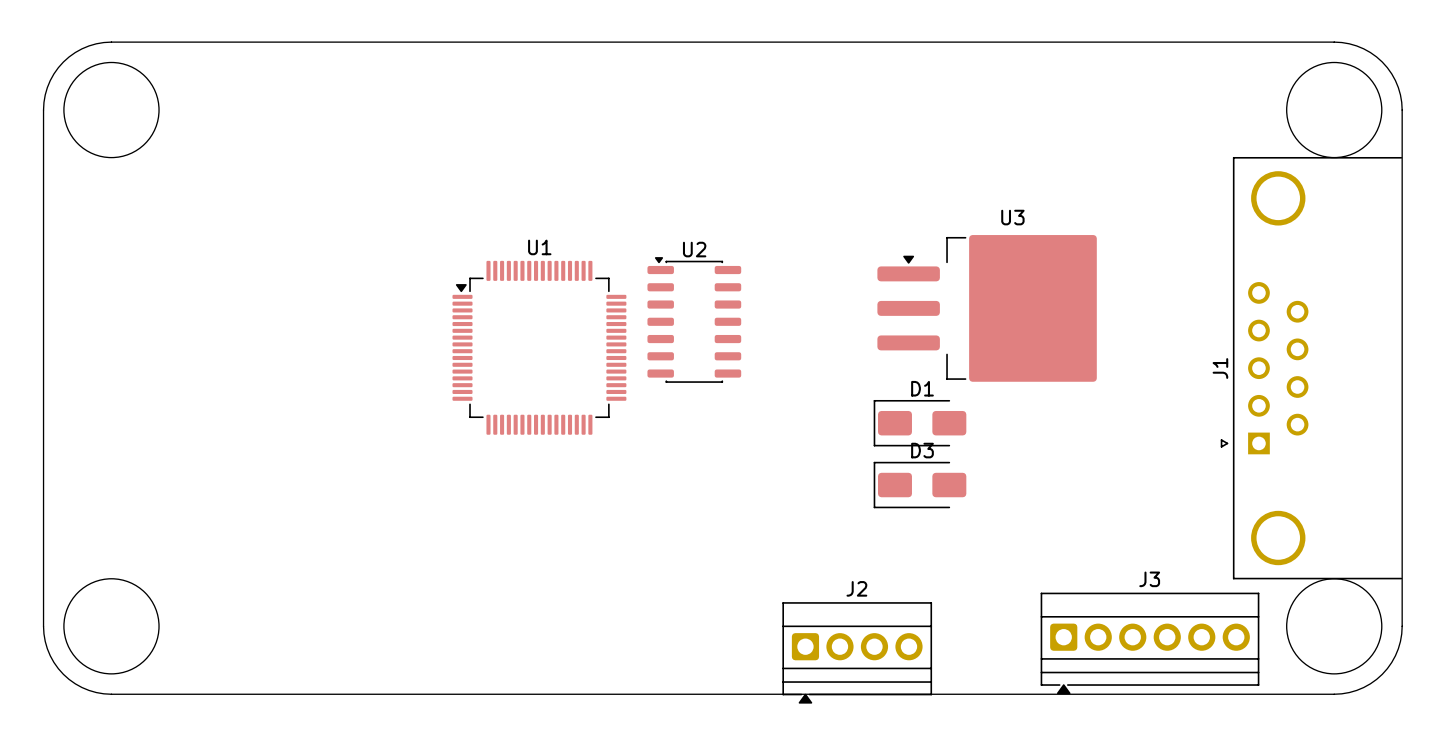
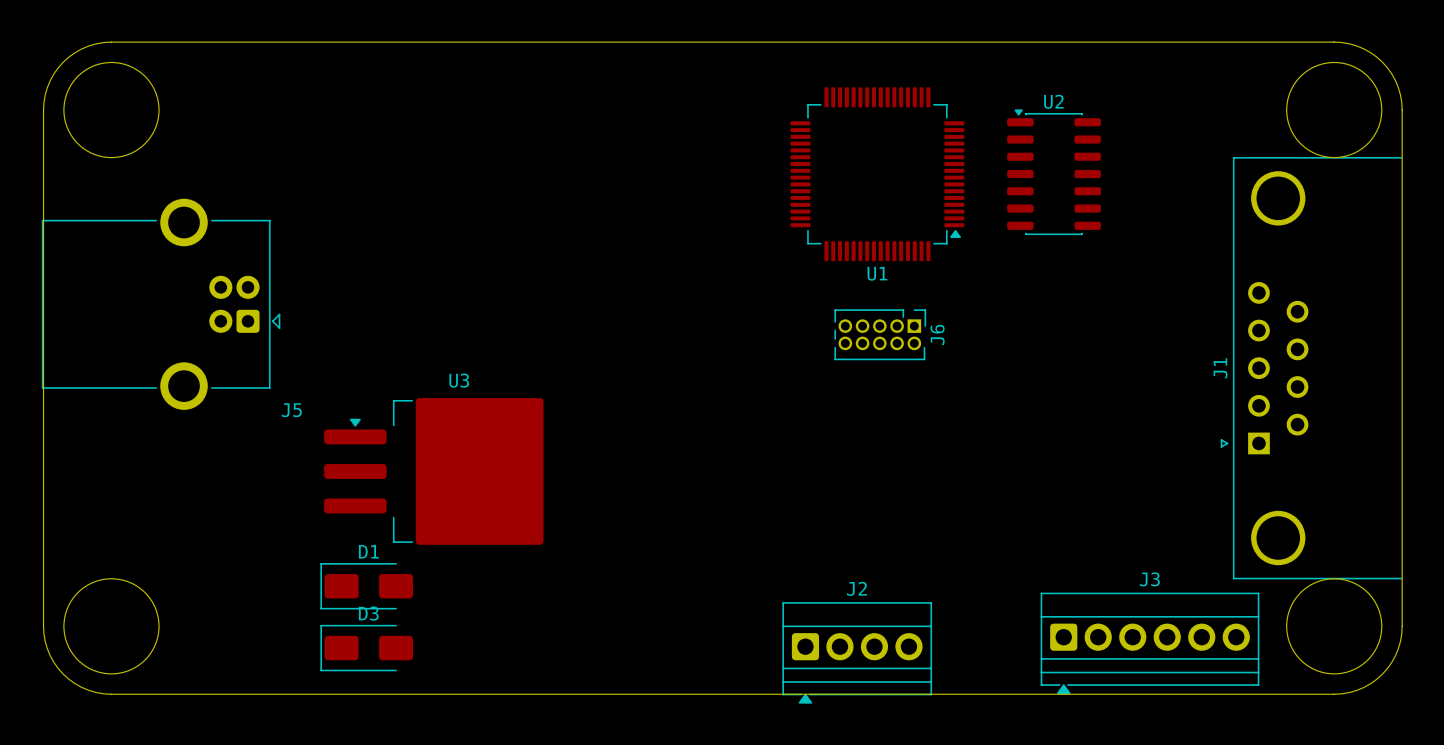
J5: none -> (161, 304)
U3 position: (987, 308) -> (433, 471)
U2 position: (694, 319) -> (1054, 172)
J6: none -> (880, 334)
U1 rotation: 0° (539, 347) -> 180° (877, 174)
U1 position: (539, 347) -> (877, 174)
D1 position: (919, 423) -> (366, 586)
D3 position: (919, 485) -> (366, 648)

